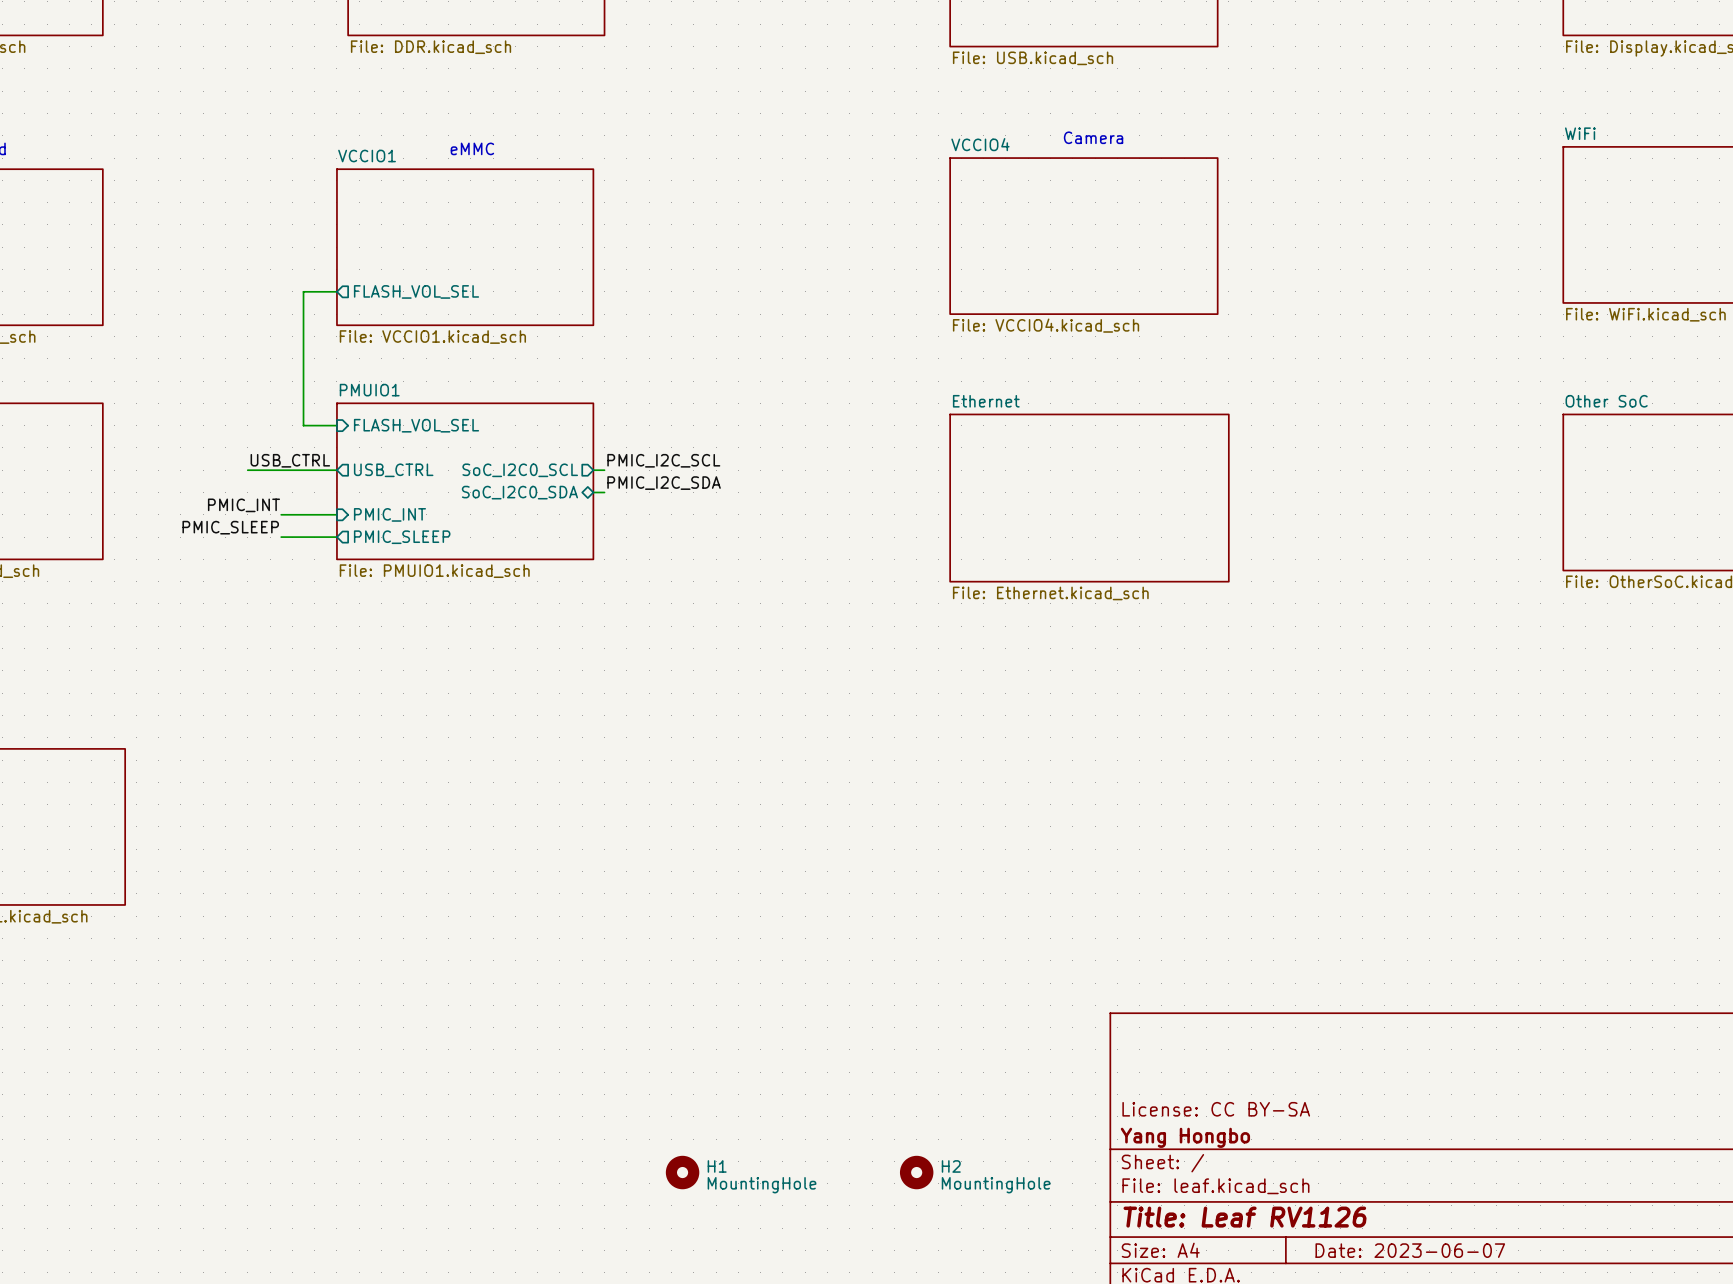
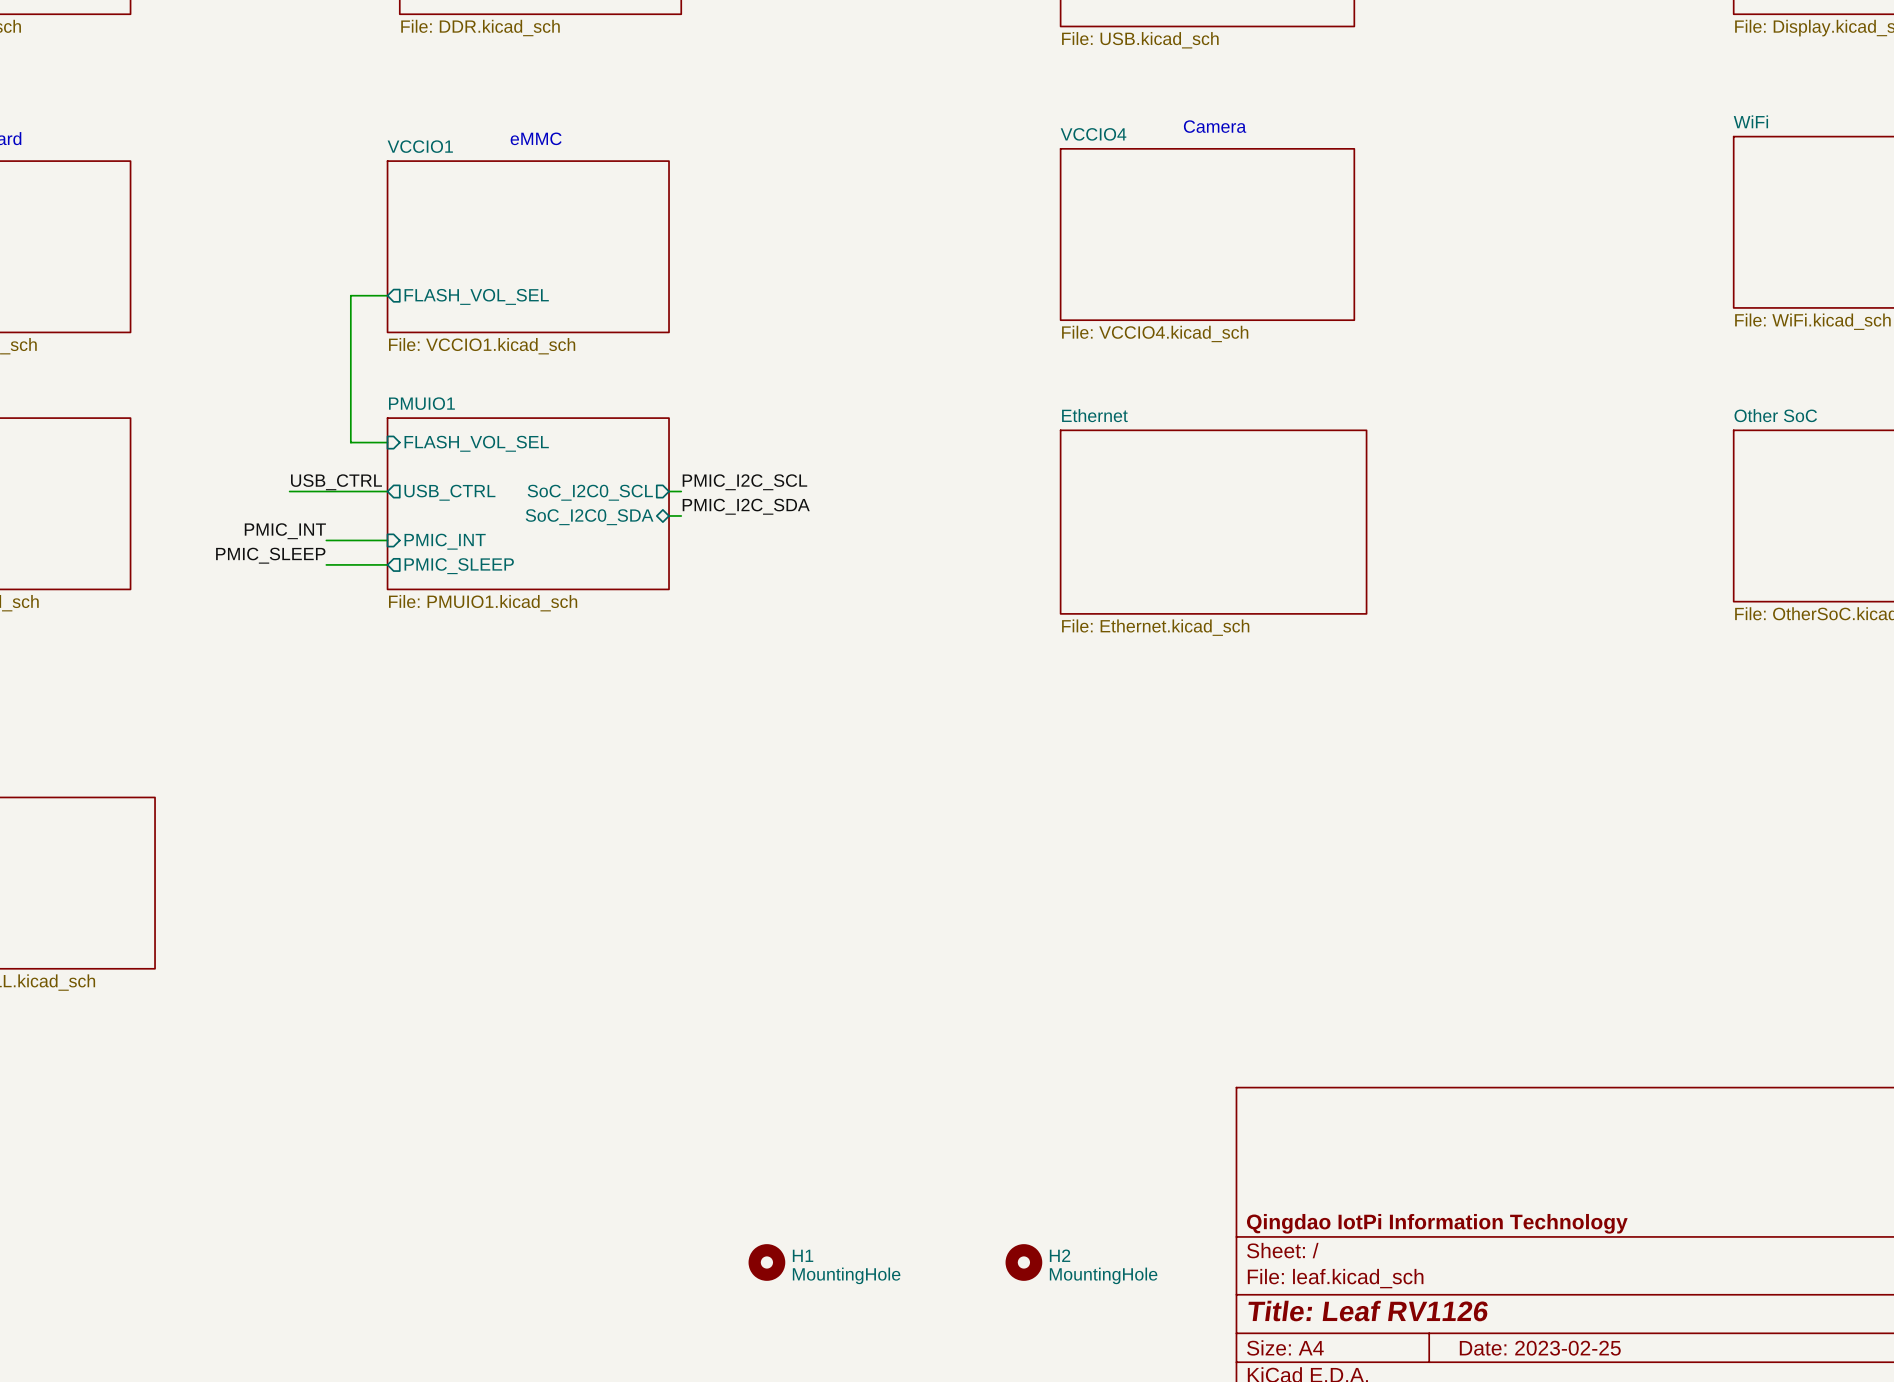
title block: License: CC BY-SA (1216, 1109) -> none
title block: Yang Hongbo (1185, 1137) -> Qingdao IotPi Information Technology (1437, 1223)
title block: Date: 2023-06-07 (1410, 1250) -> Date: 2023-02-25 (1540, 1348)

